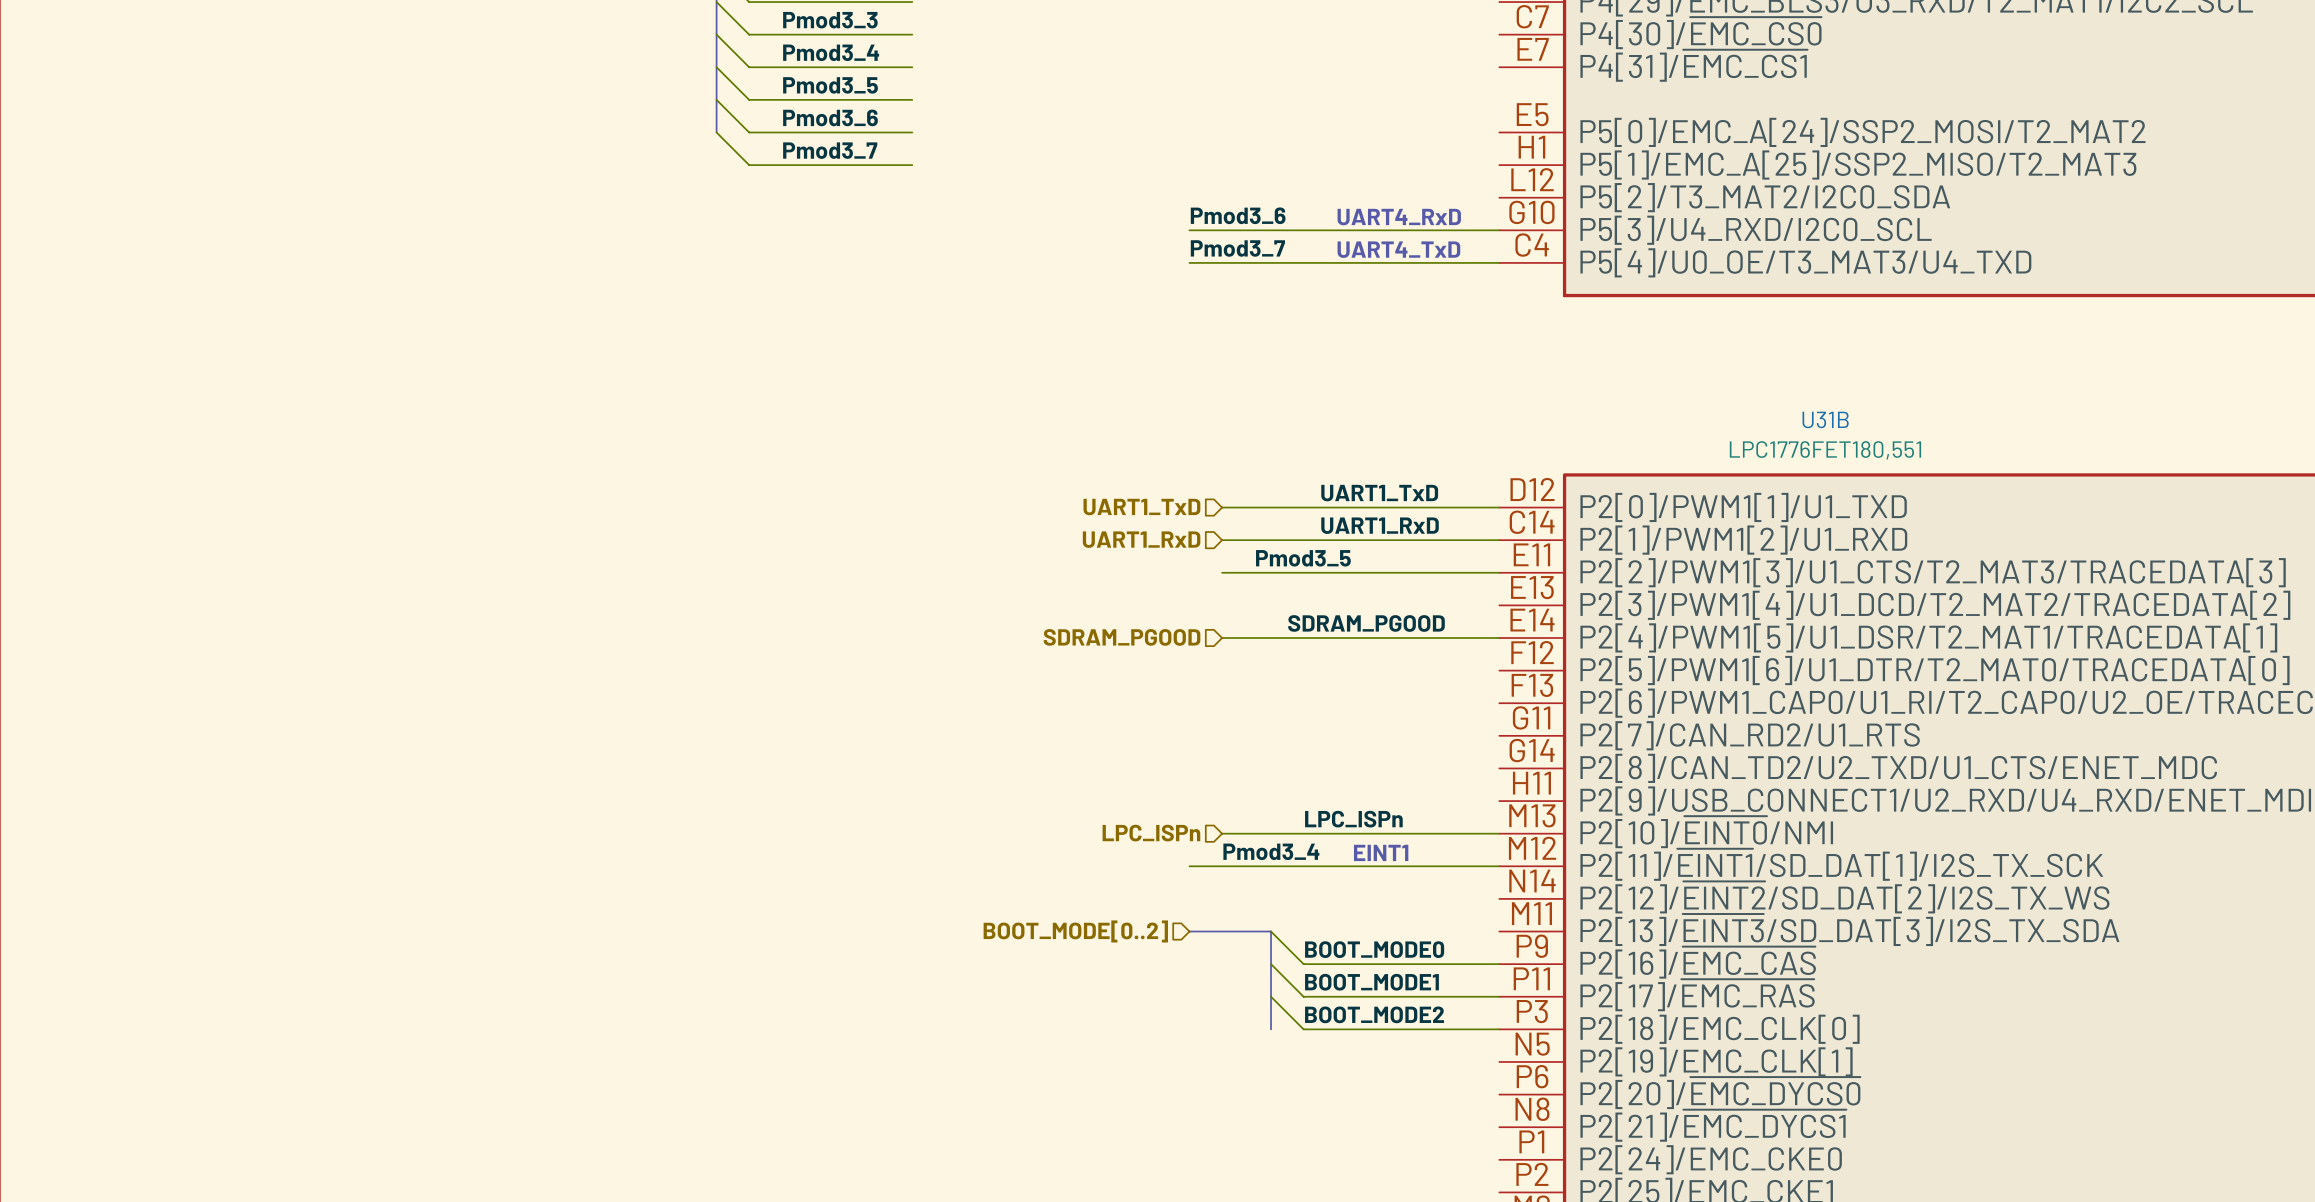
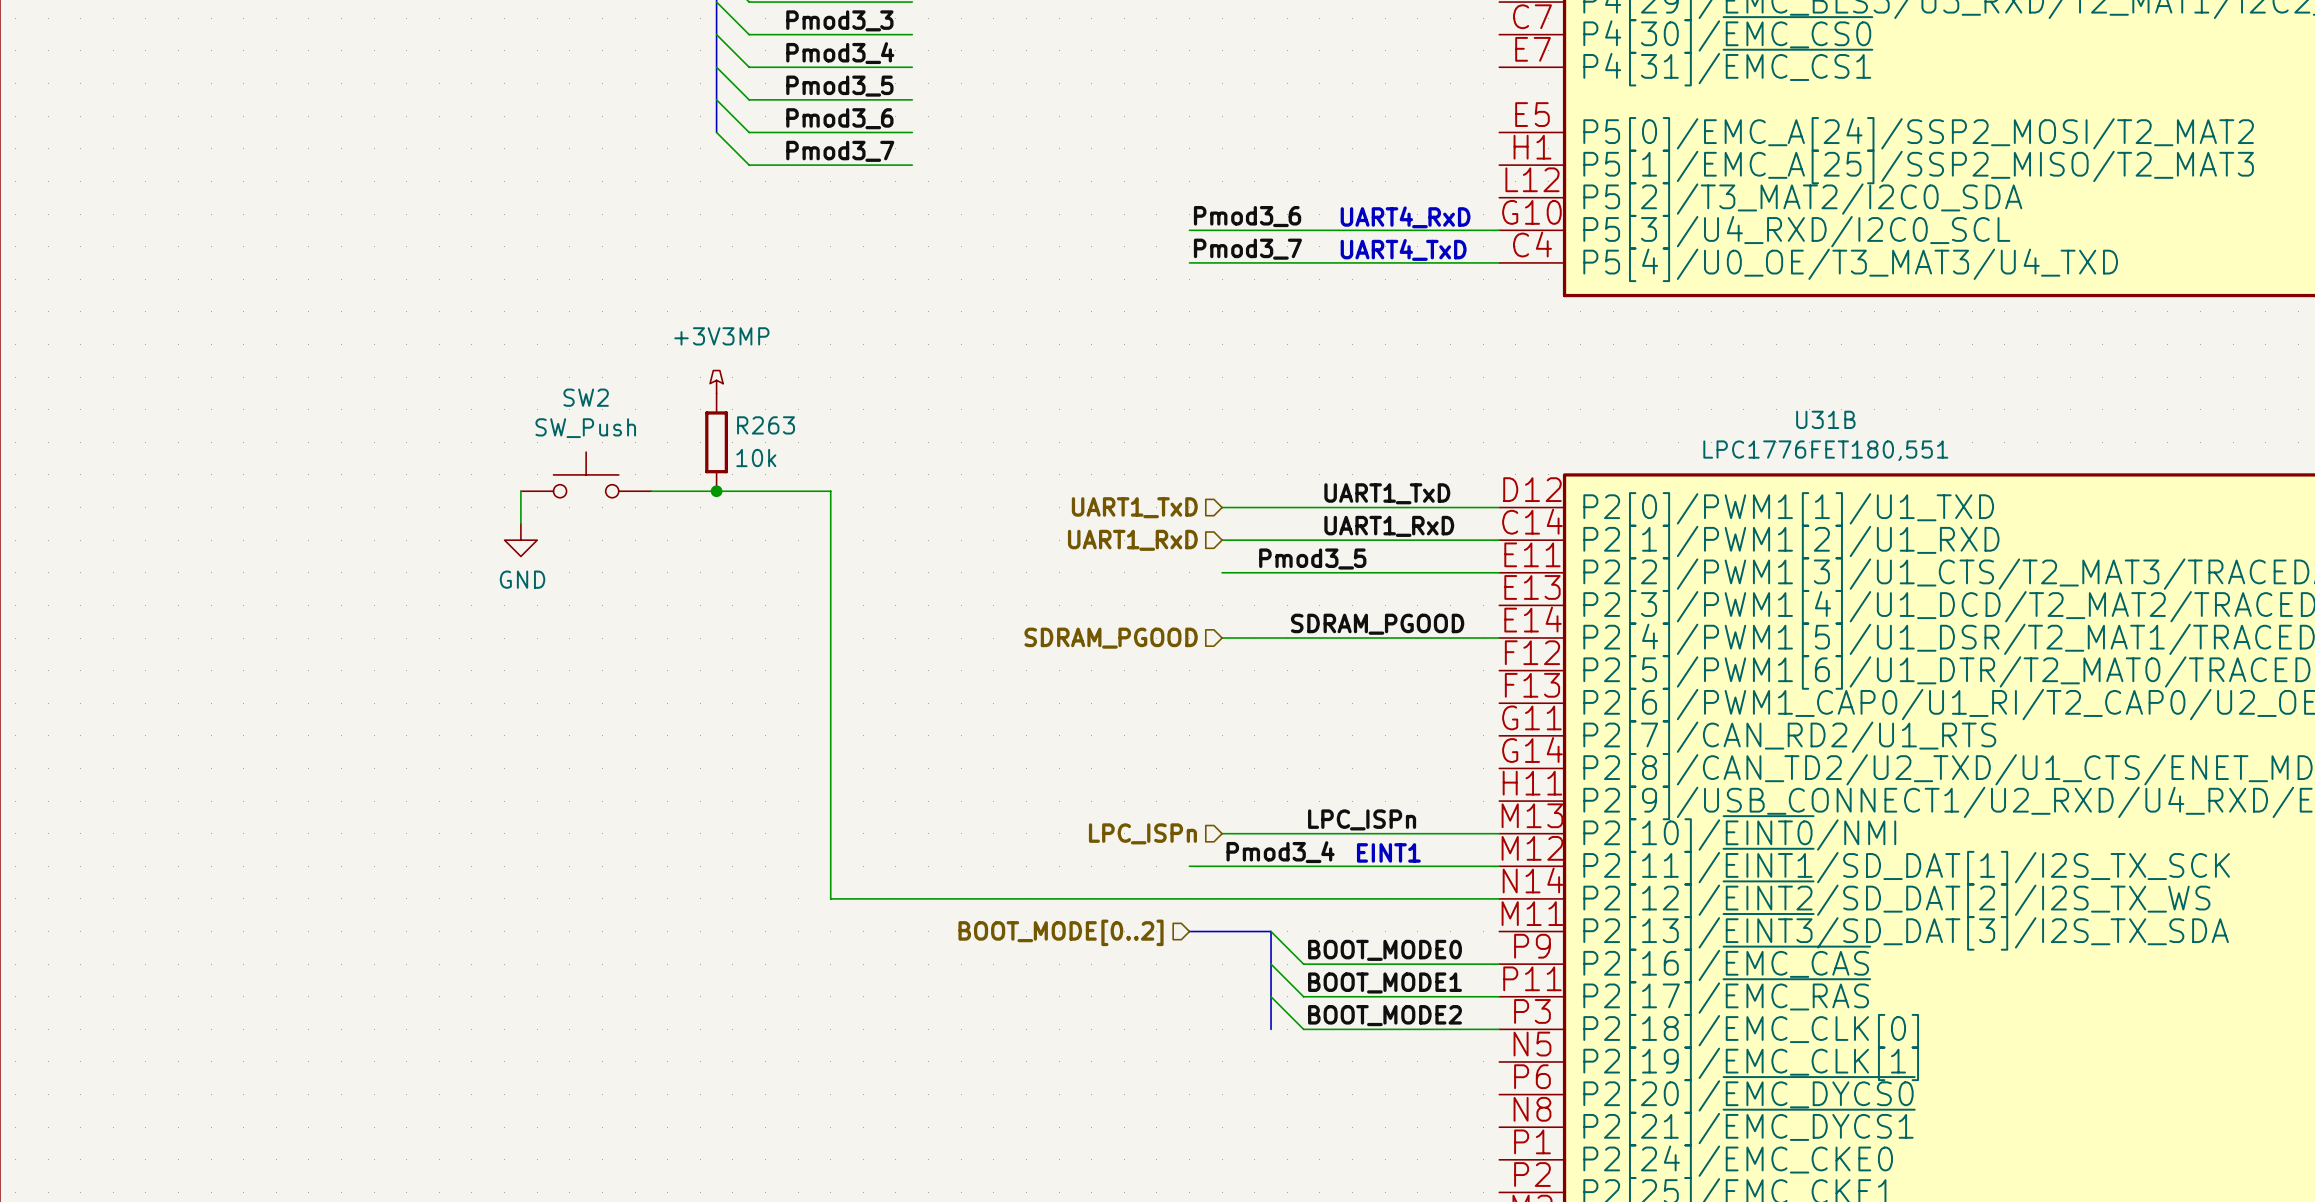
power symbol: none -> +3V3MP (716, 381)
R263: none -> (716, 442)
SW2: none -> SW_Push (586, 474)
wire: none -> (520, 491) (520, 523)
wire: none -> (651, 491) (830, 491) (830, 898) (1499, 898)
junction: none -> (716, 491)
power symbol: none -> GND (520, 540)

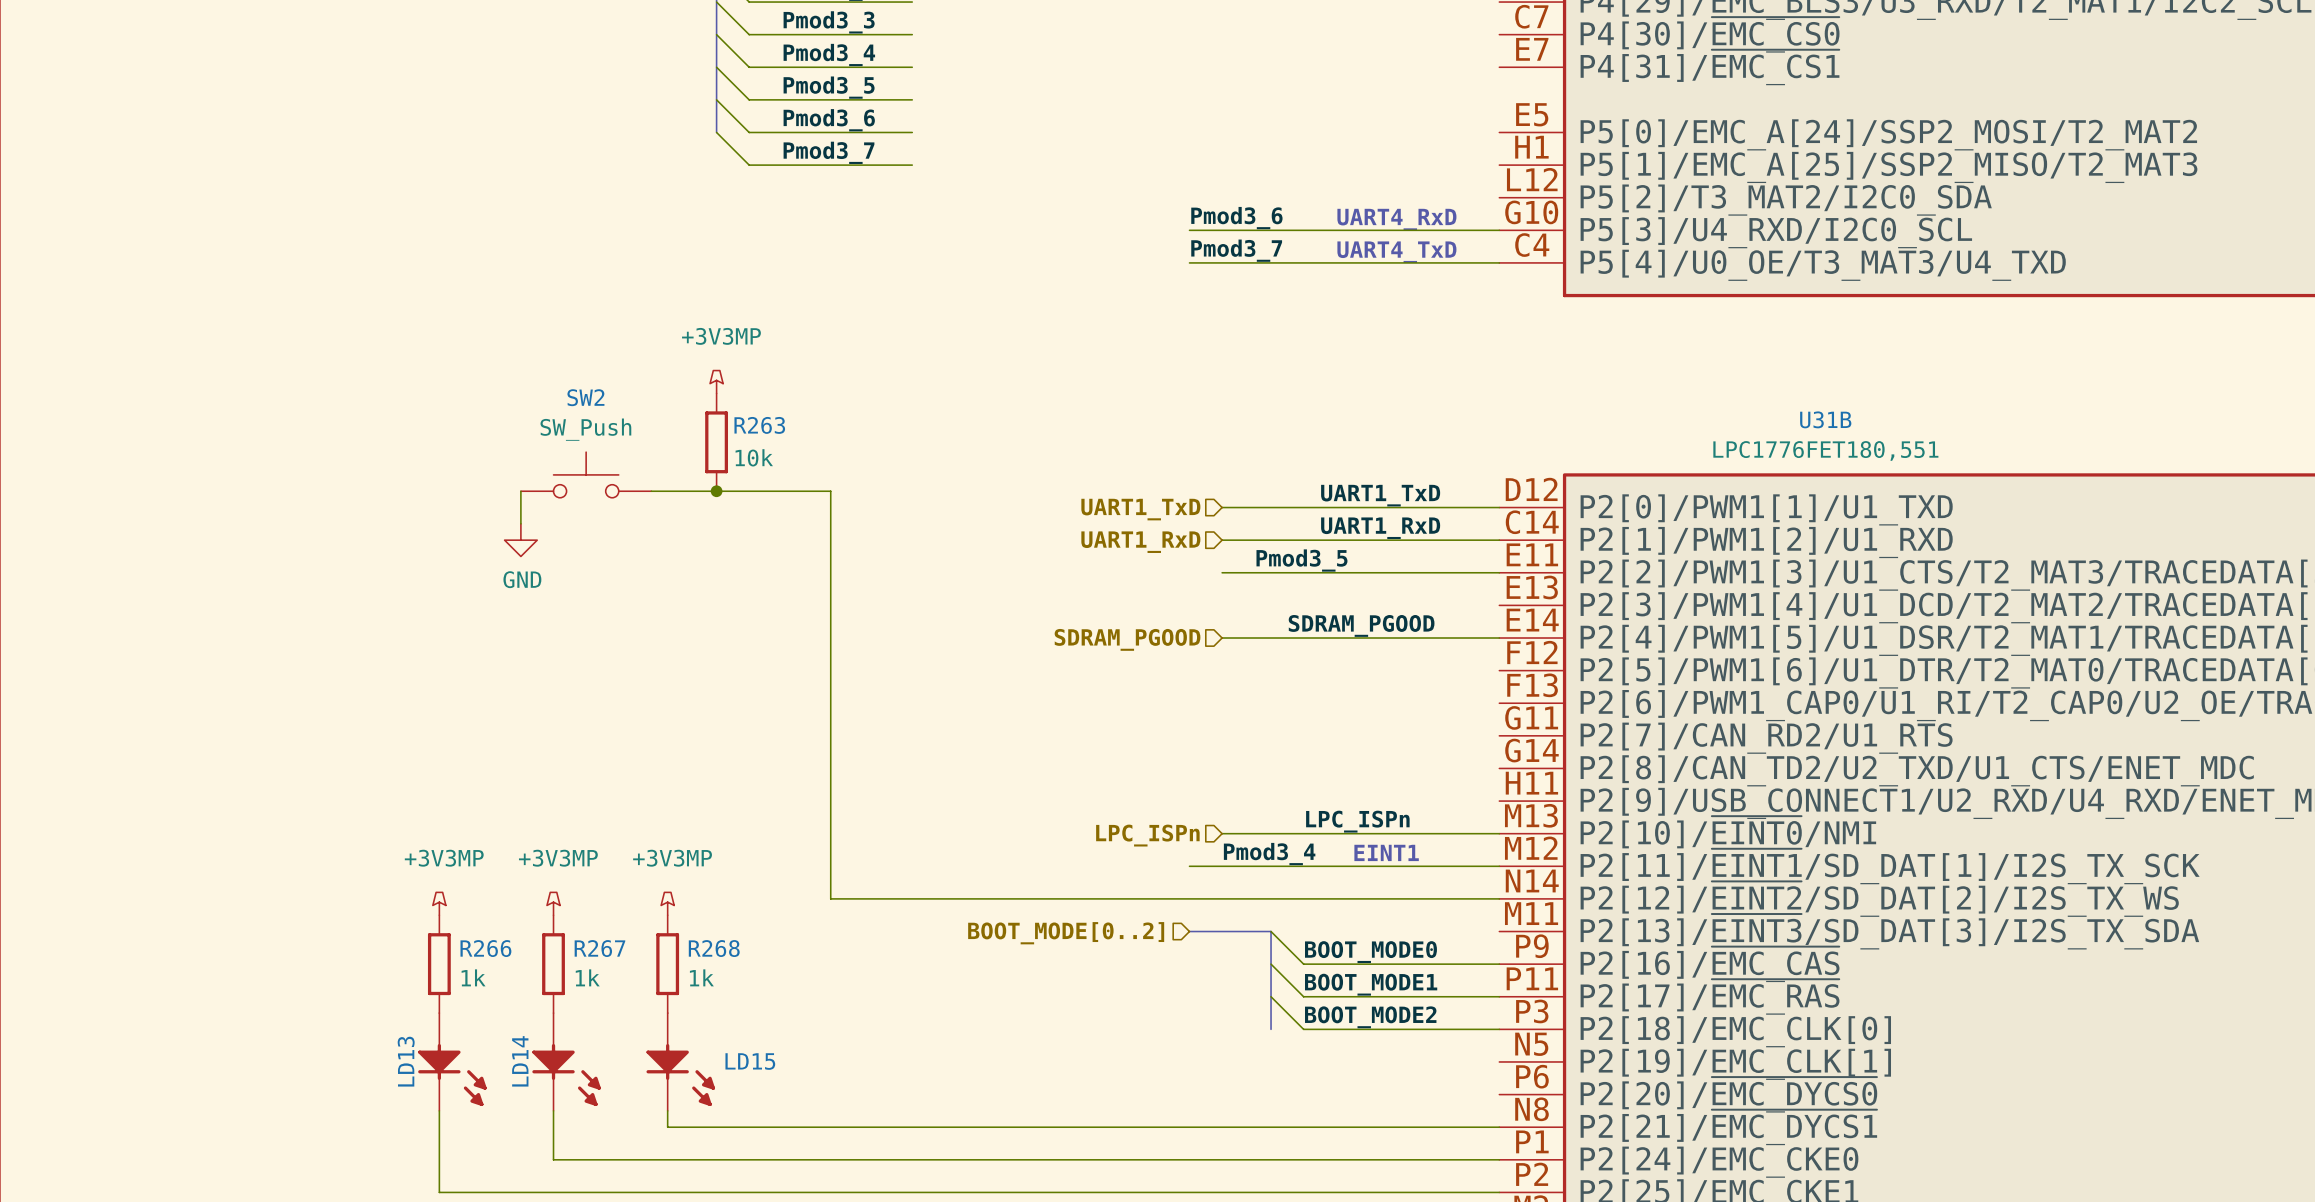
power symbol: none -> +3V3MP (439, 903)
power symbol: none -> +3V3MP (553, 903)
power symbol: none -> +3V3MP (667, 903)
R266: none -> (439, 964)
R267: none -> (553, 964)
R268: none -> (667, 964)
LD13: none -> (452, 1061)
LD14: none -> (566, 1061)
LD15: none -> (680, 1061)
wire: none -> (439, 1110) (439, 1192) (1499, 1192)
wire: none -> (553, 1110) (553, 1159) (1499, 1159)
wire: none -> (667, 1110) (667, 1127) (1499, 1127)

